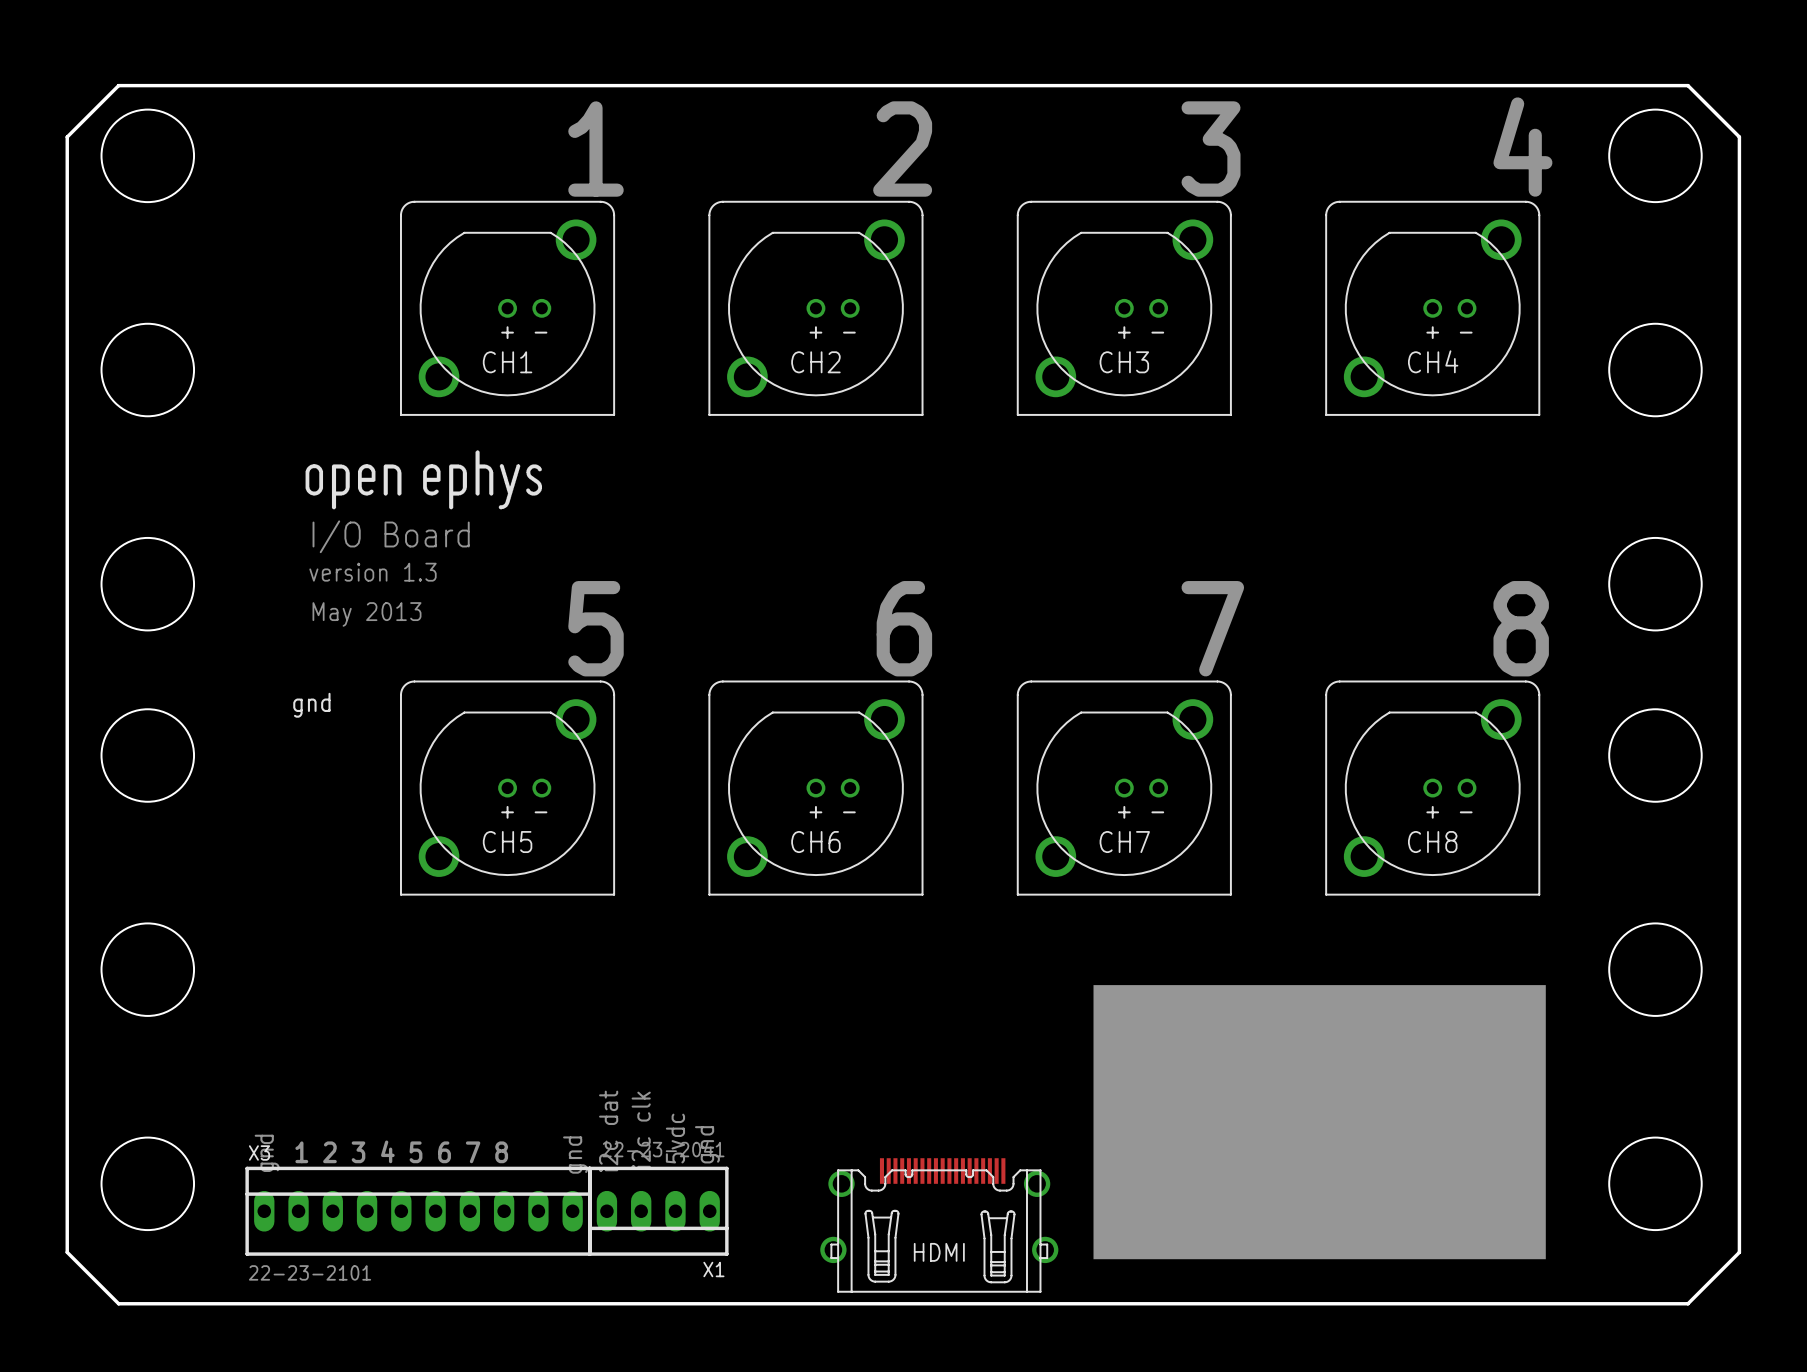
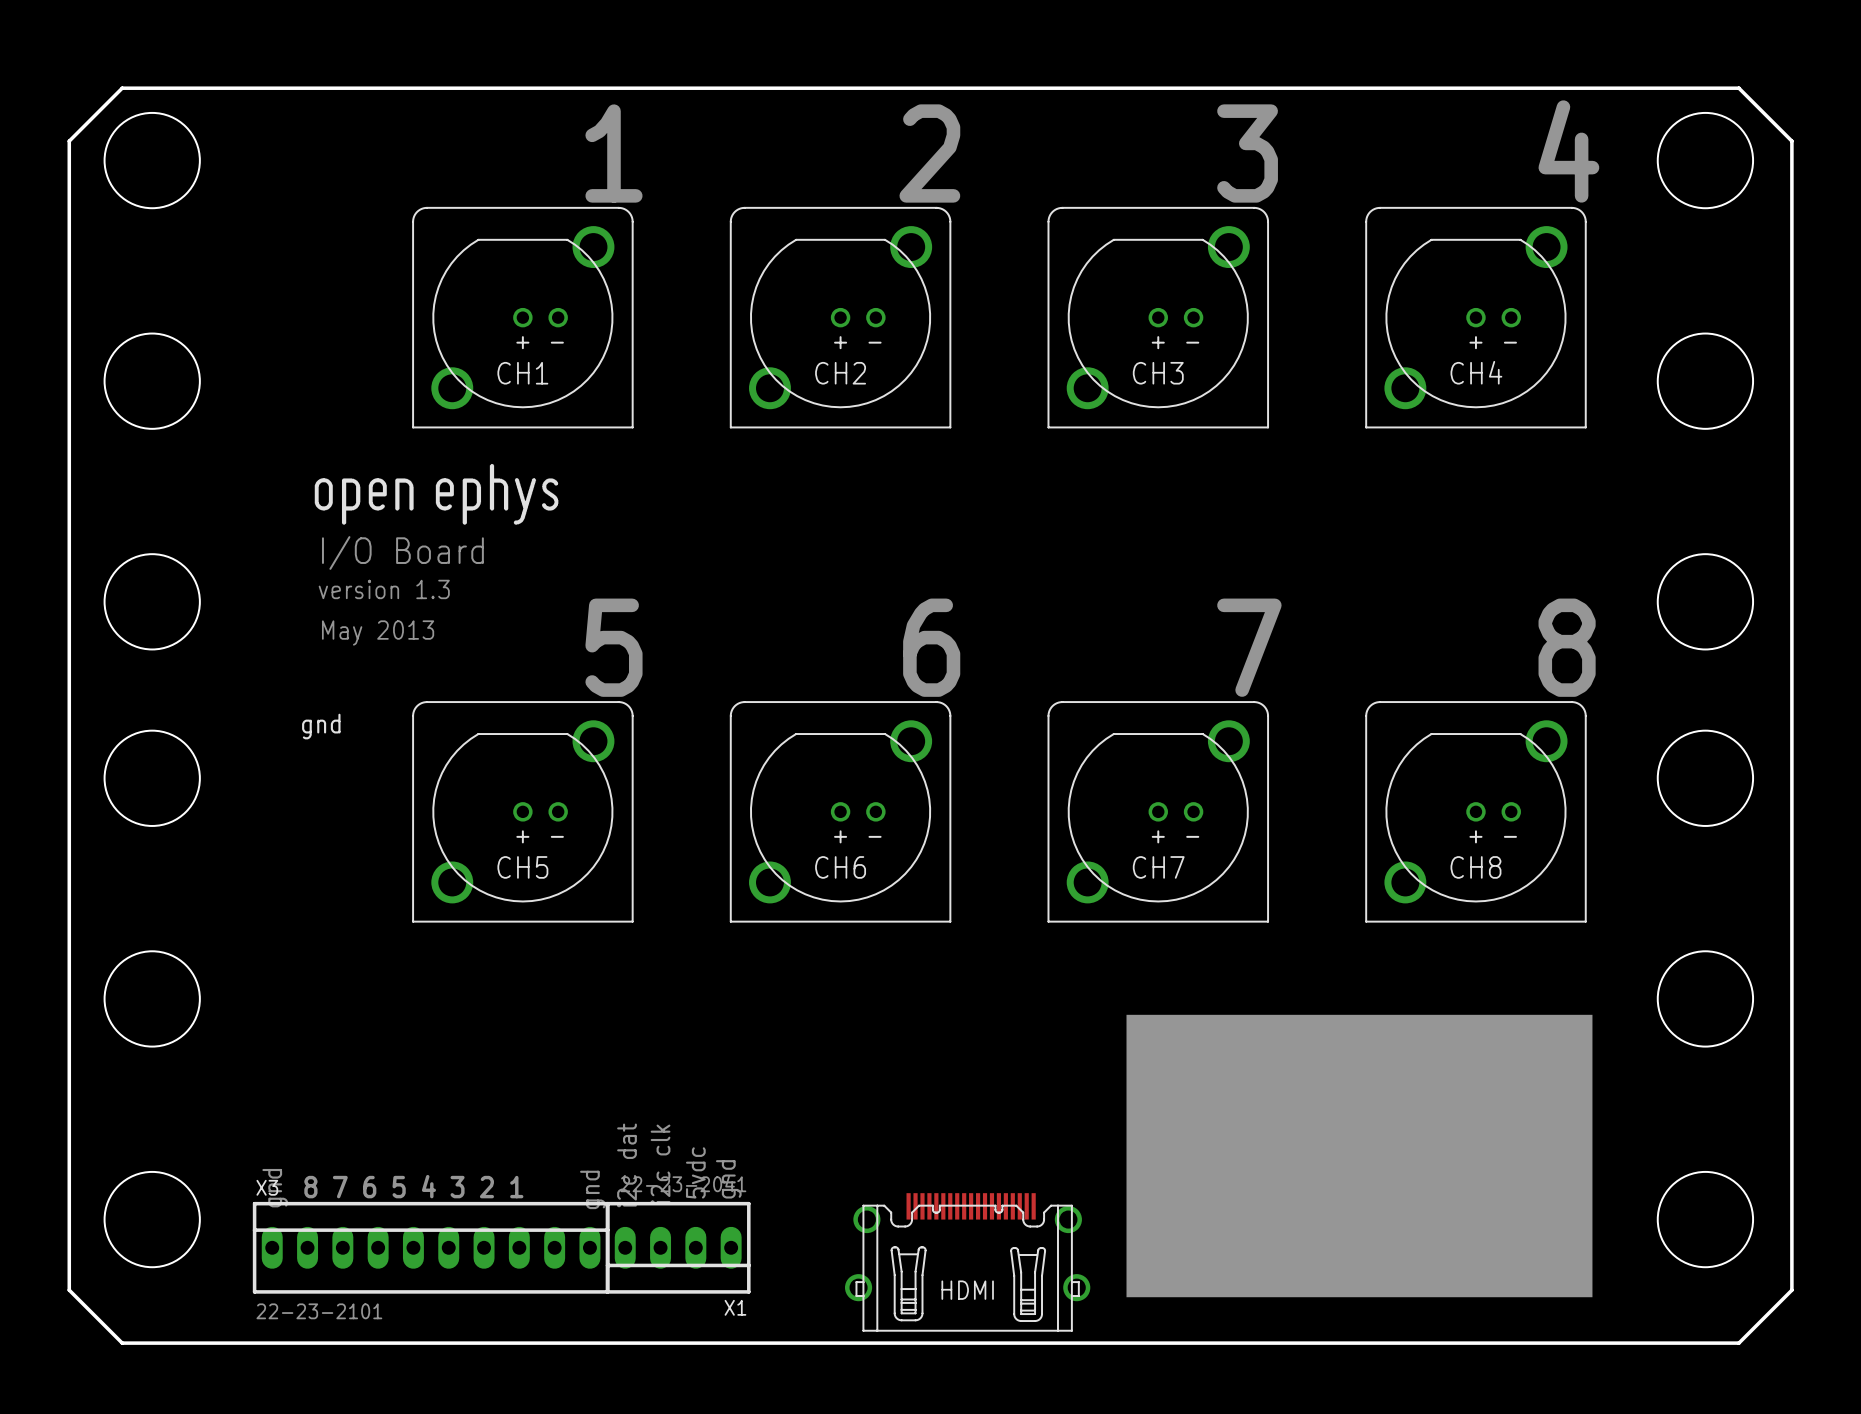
text: 1 2 3 4 5 6 7 8 (401, 1151) -> 8 7 6 5 4 3 2 1 (413, 1186)

